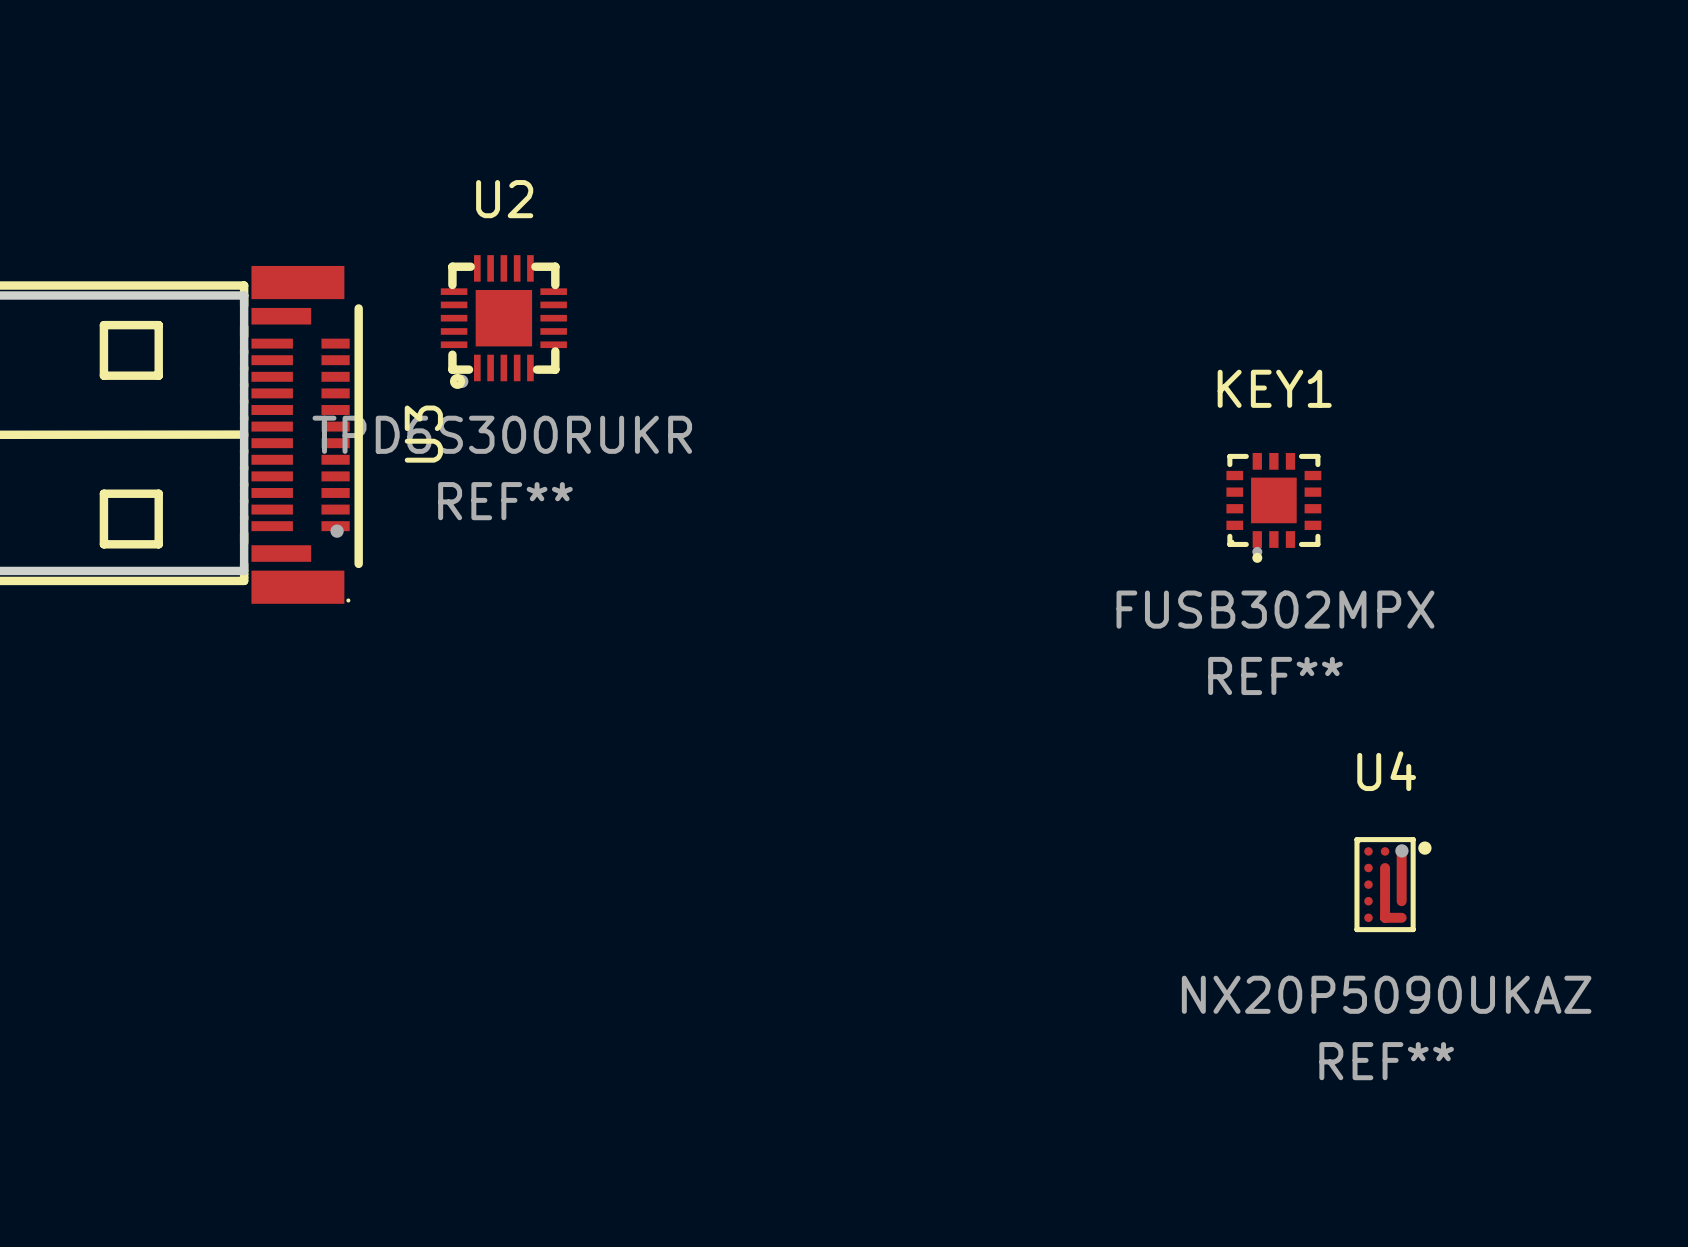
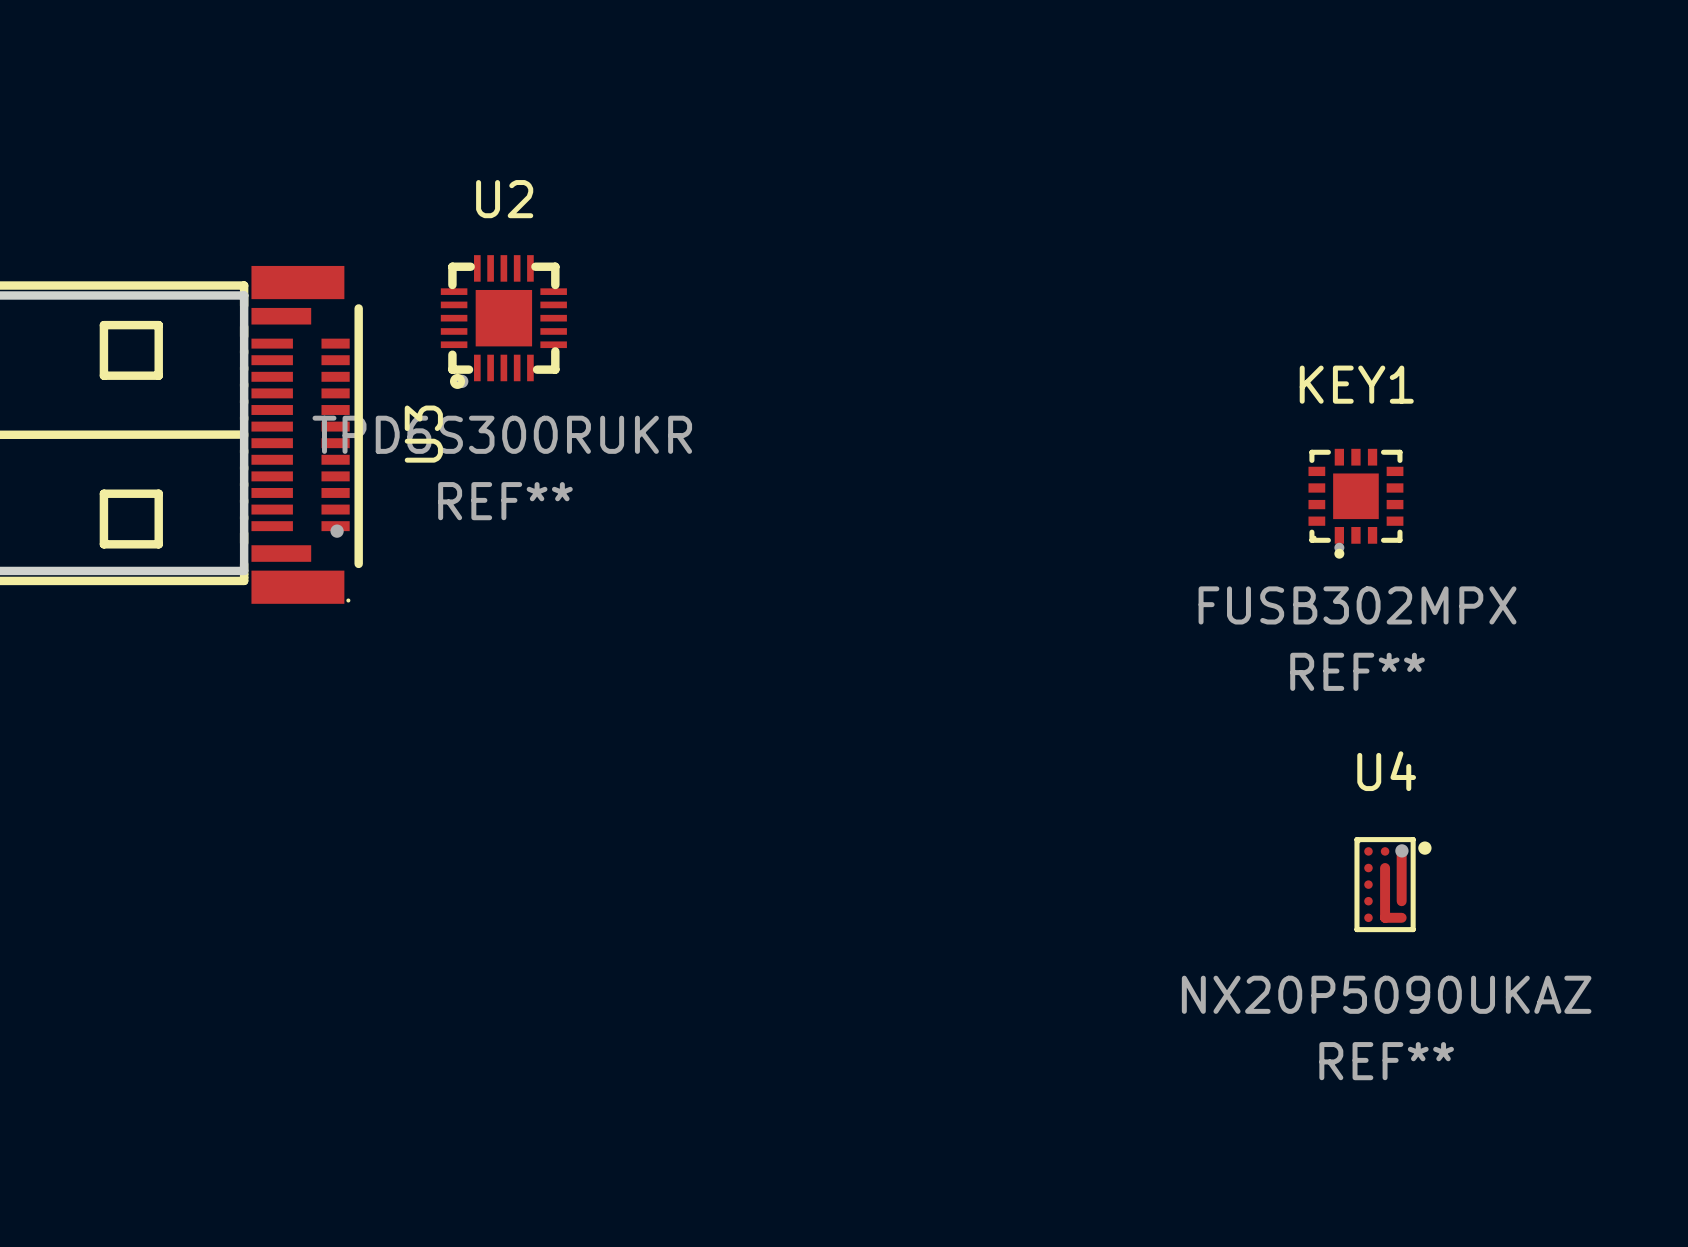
KEY1 position: (1273, 507) -> (1355, 503)

